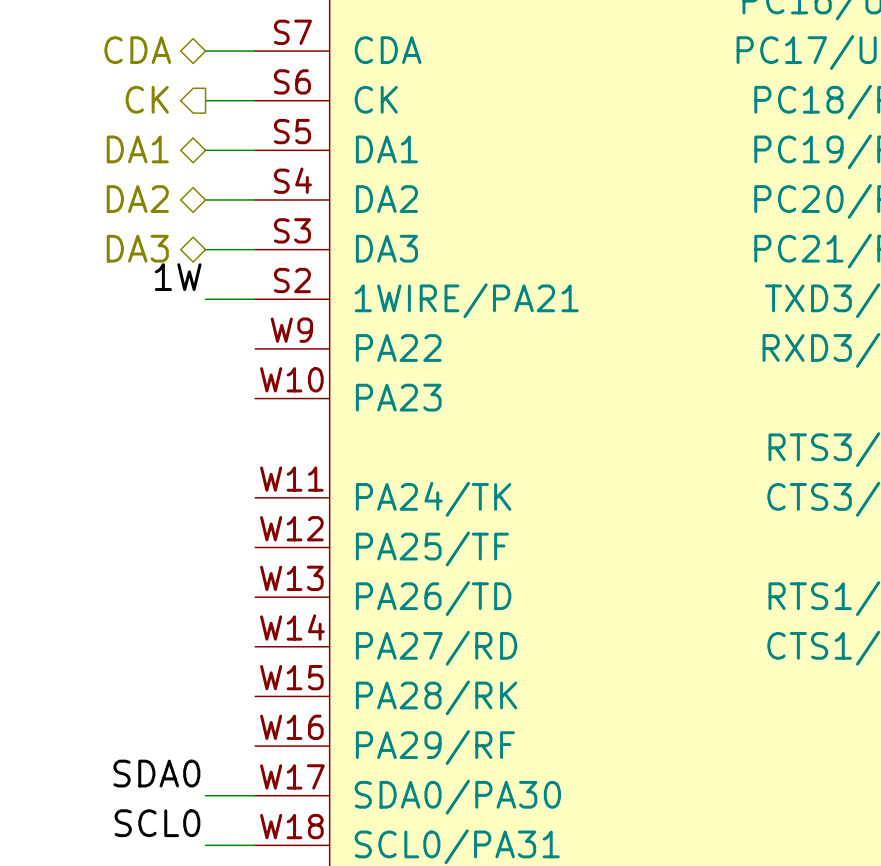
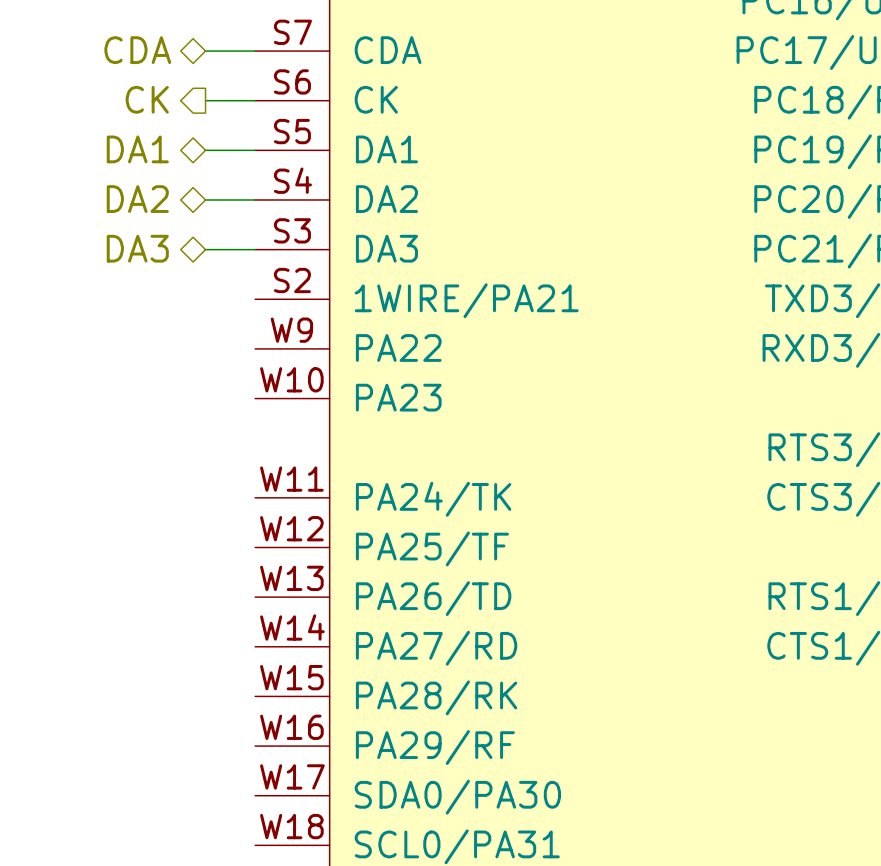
label: 1W (178, 277) -> none
wire: (205, 299) (255, 299) -> none
label: SDA0 (156, 773) -> none
wire: (205, 795) (255, 795) -> none
label: SCL0 (157, 823) -> none
wire: (205, 845) (255, 845) -> none

